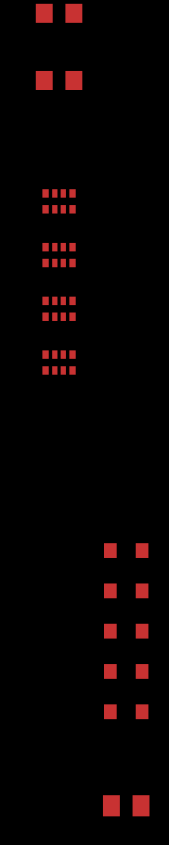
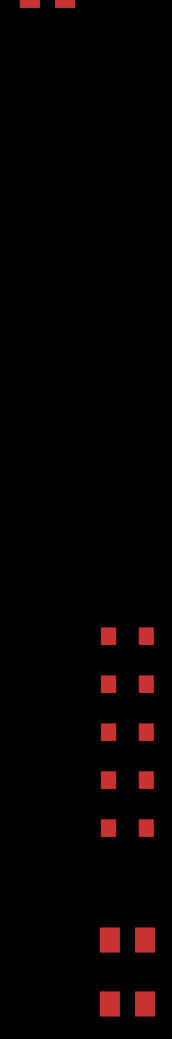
part: (59, 80) -> none
part: (59, 201) -> none
part: (59, 255) -> none
part: (59, 308) -> none
part: (59, 362) -> none

